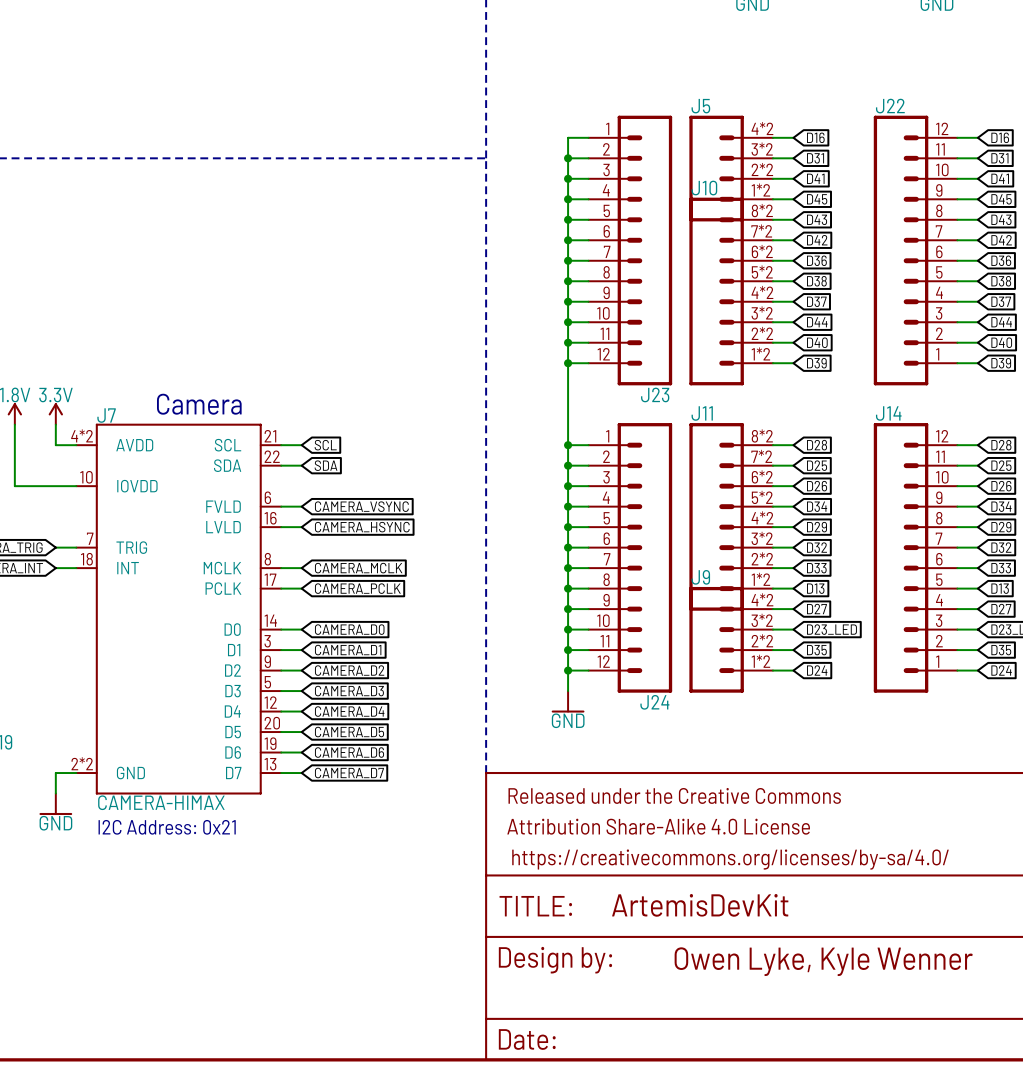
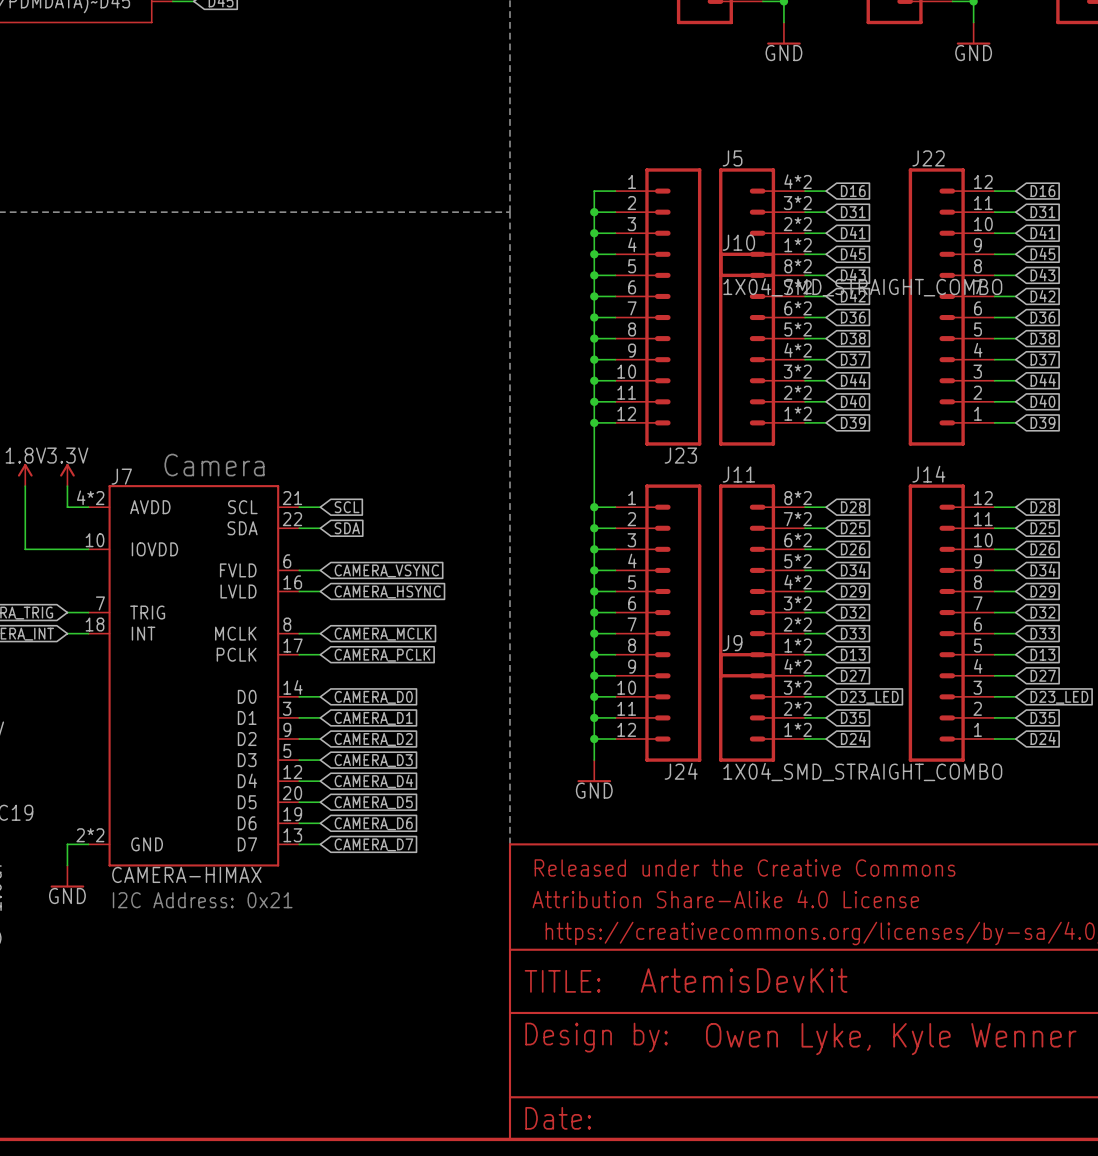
J5 value: none -> 1X04_SMD_STRAIGHT_COMBO (862, 287)
J9 value: none -> 1X04_SMD_STRAIGHT_COMBO (862, 772)

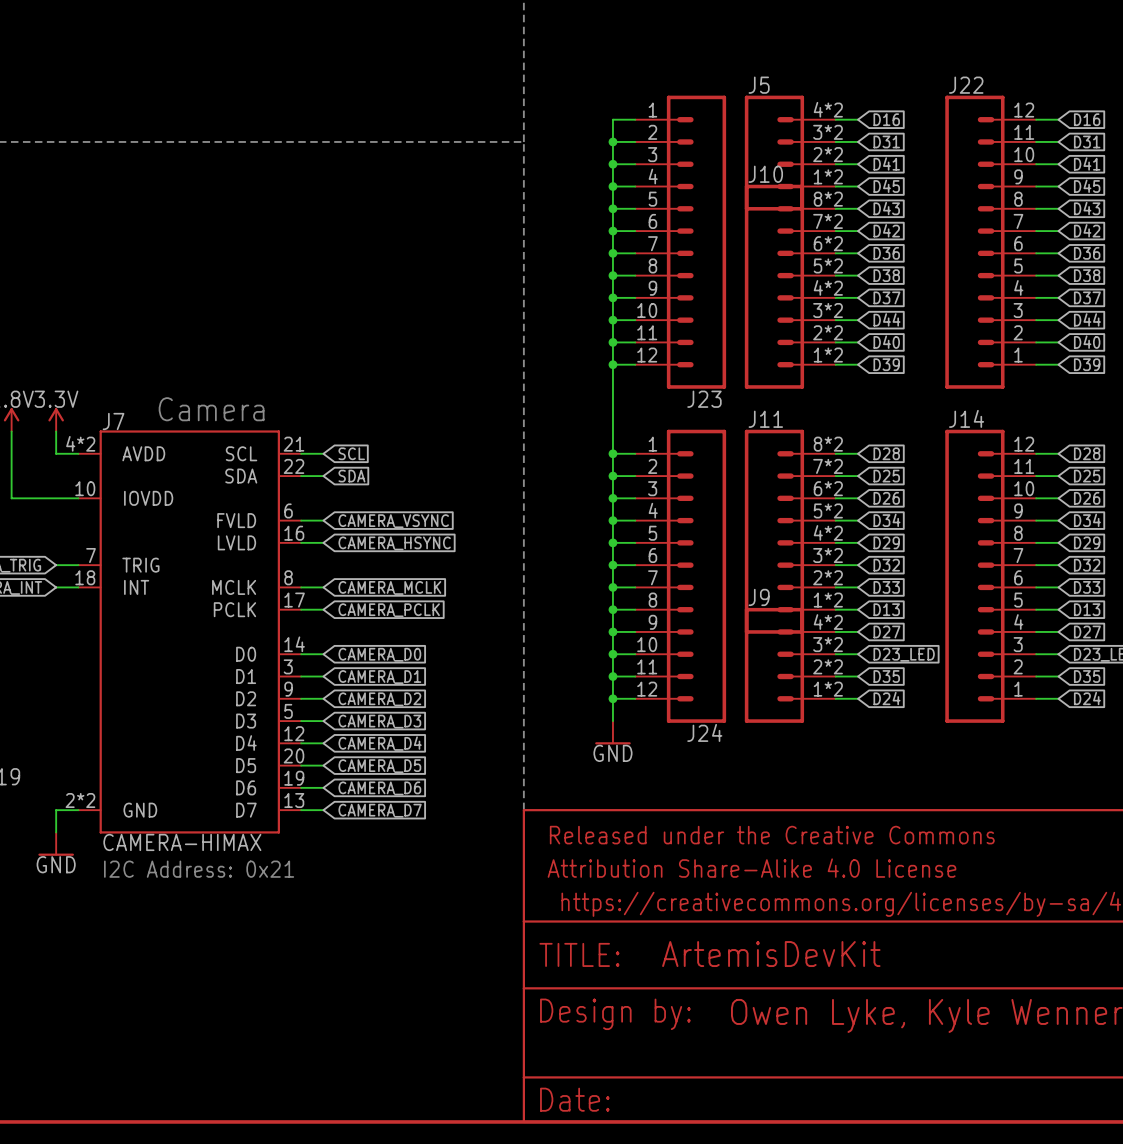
J5 value: 1X04_SMD_STRAIGHT_COMBO (862, 287) -> none
J9 value: 1X04_SMD_STRAIGHT_COMBO (862, 772) -> none

